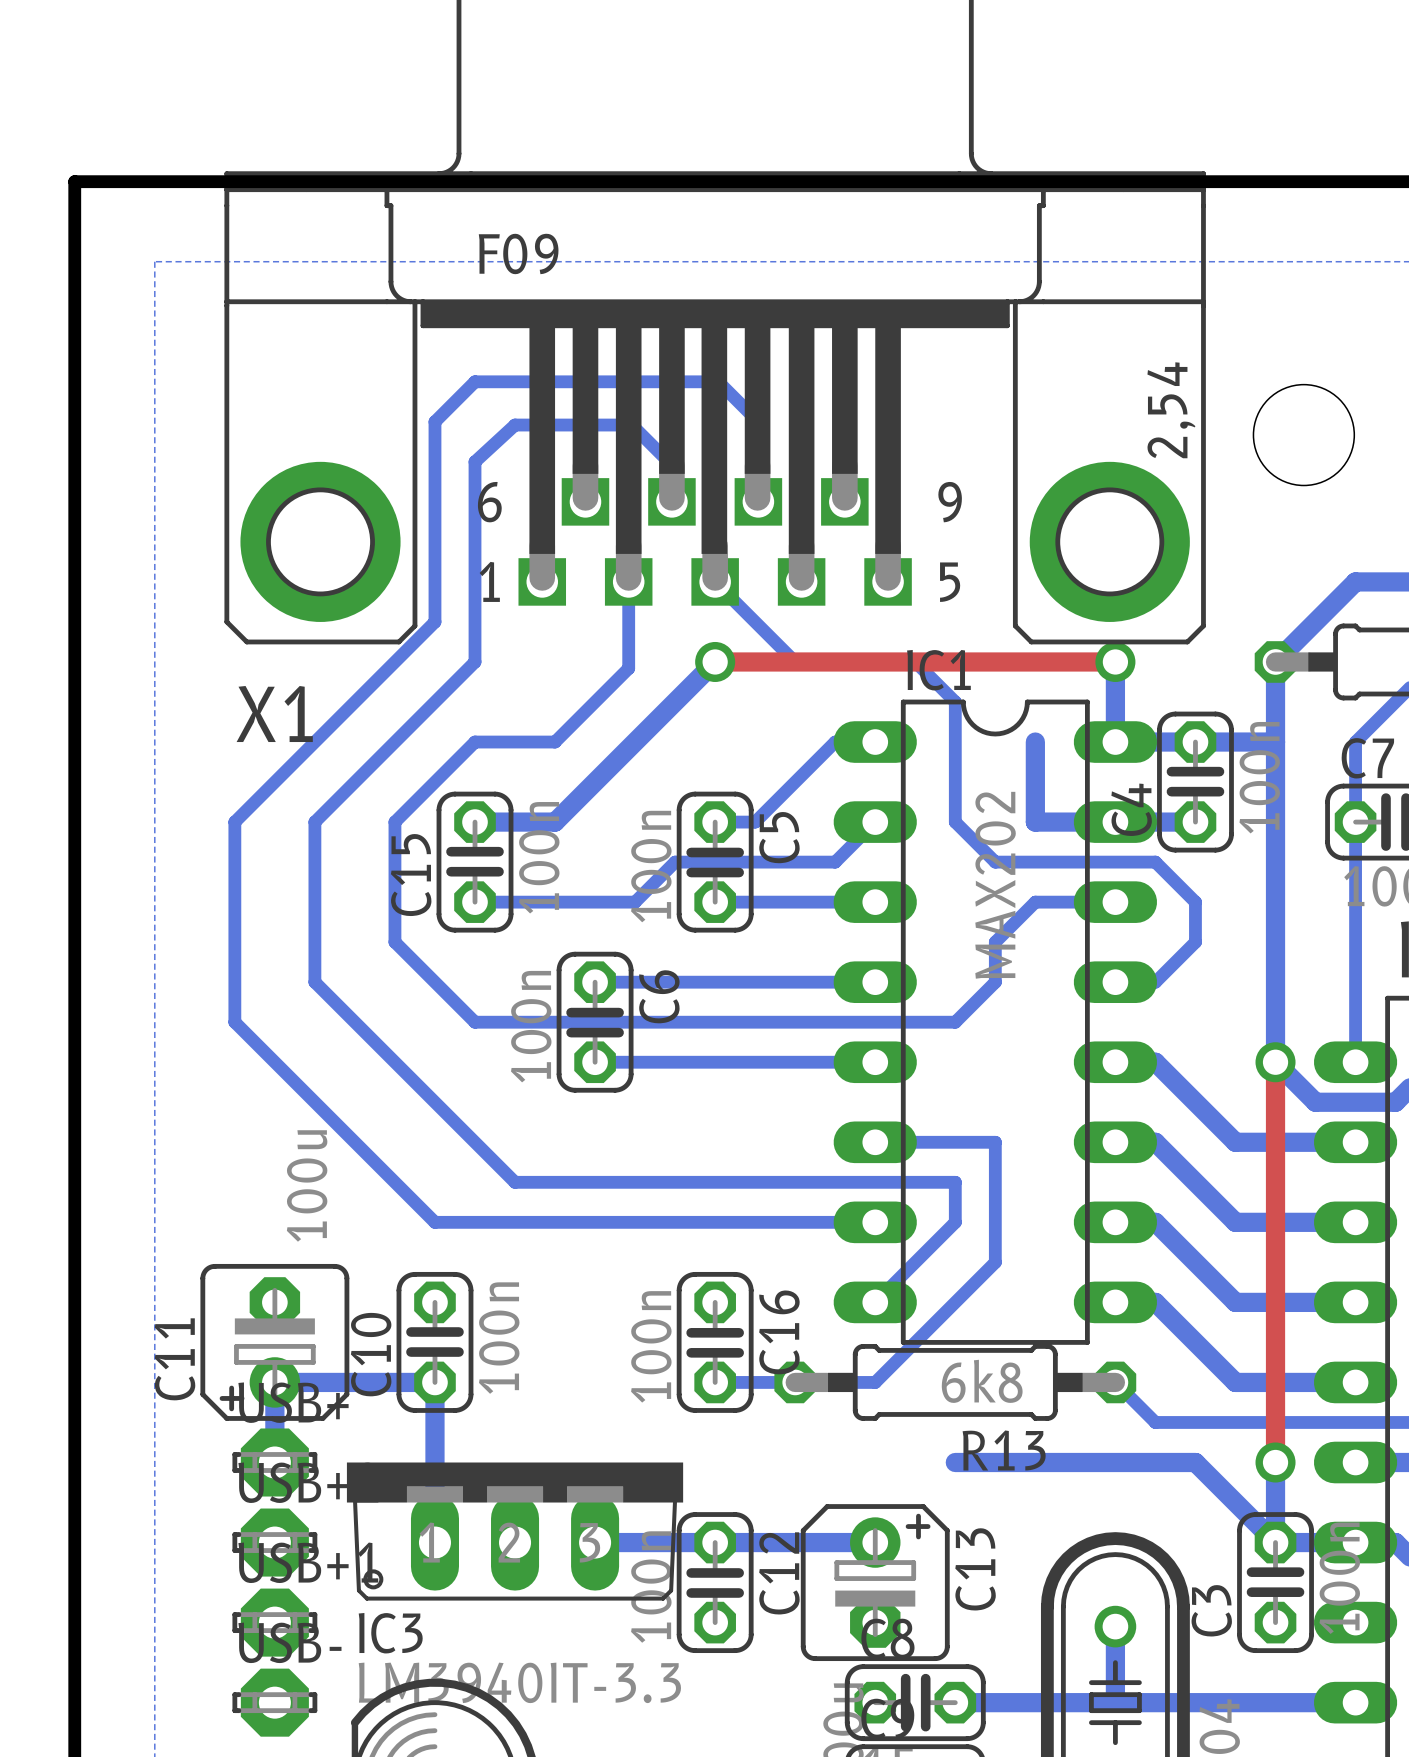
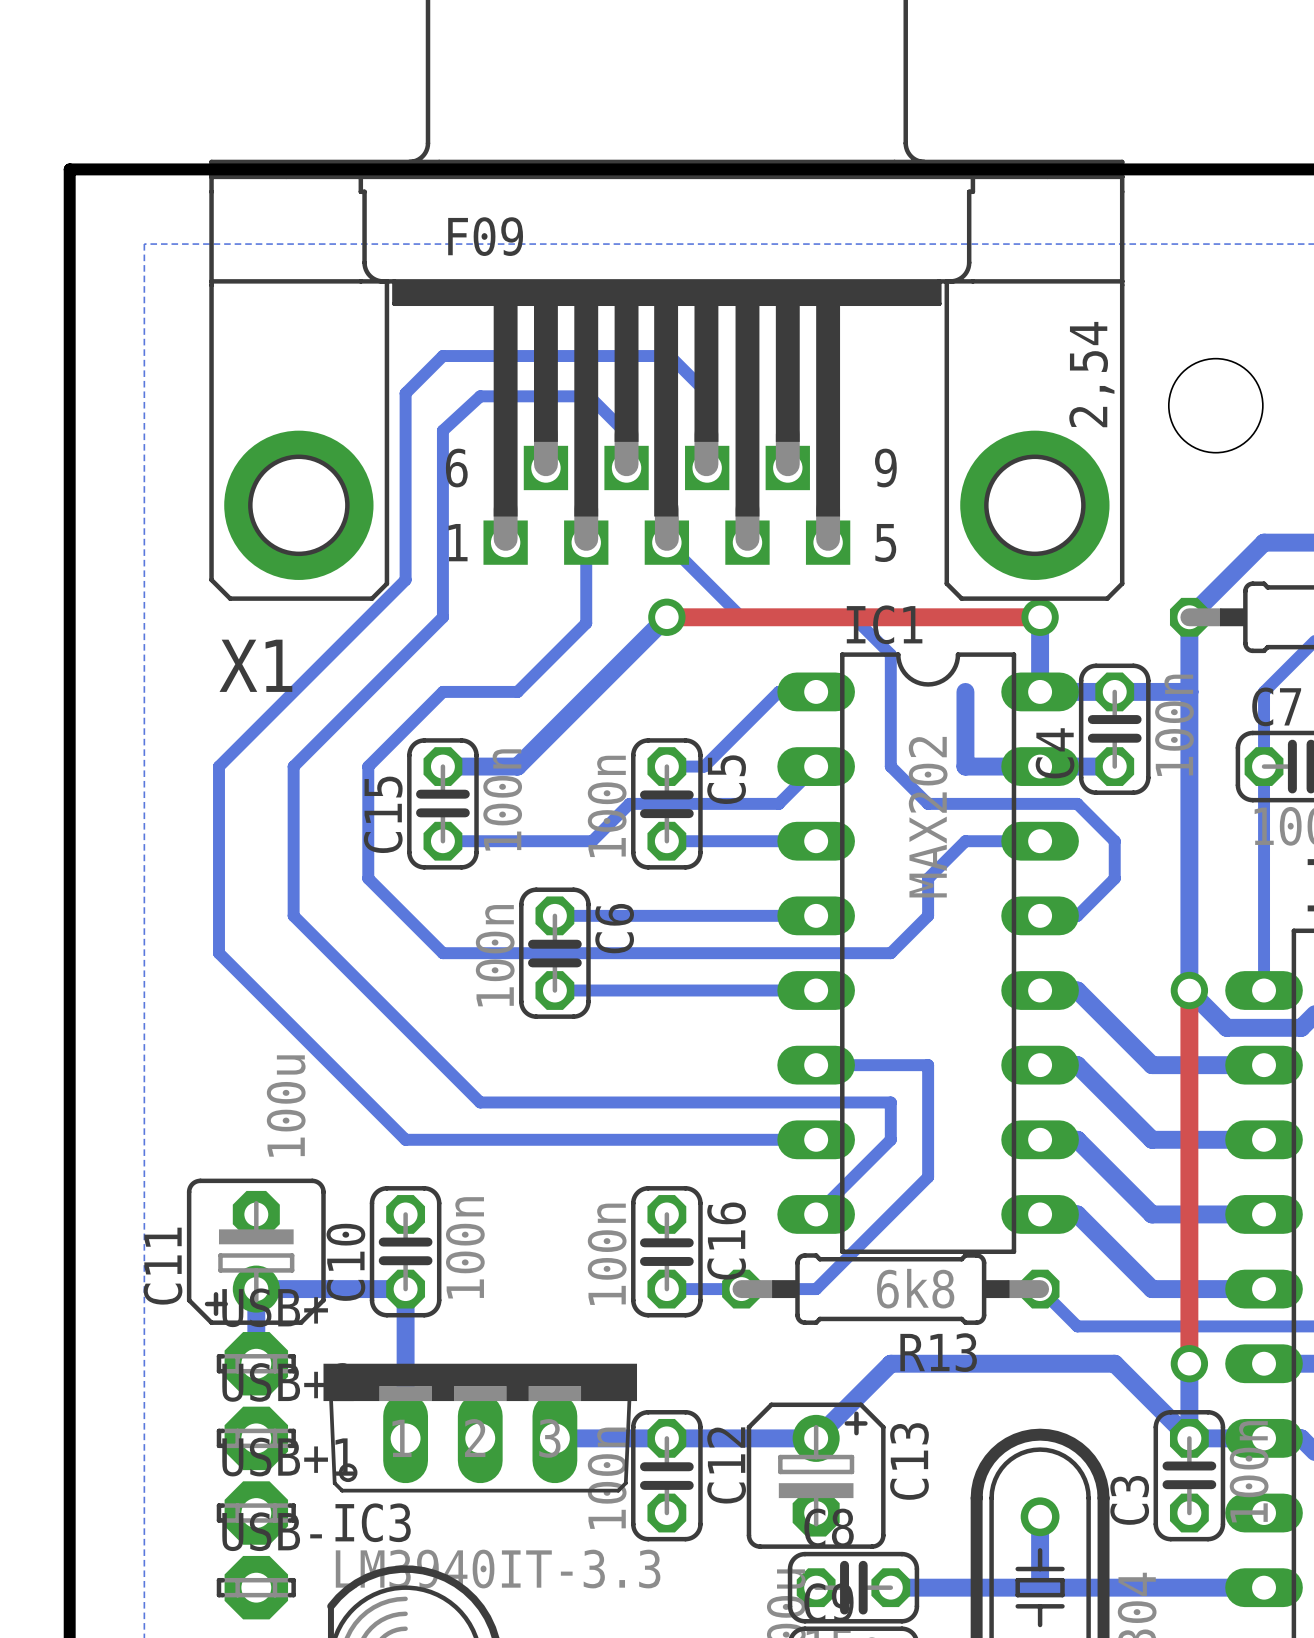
bottom track: none -> (890, 1363) (816, 1438)

